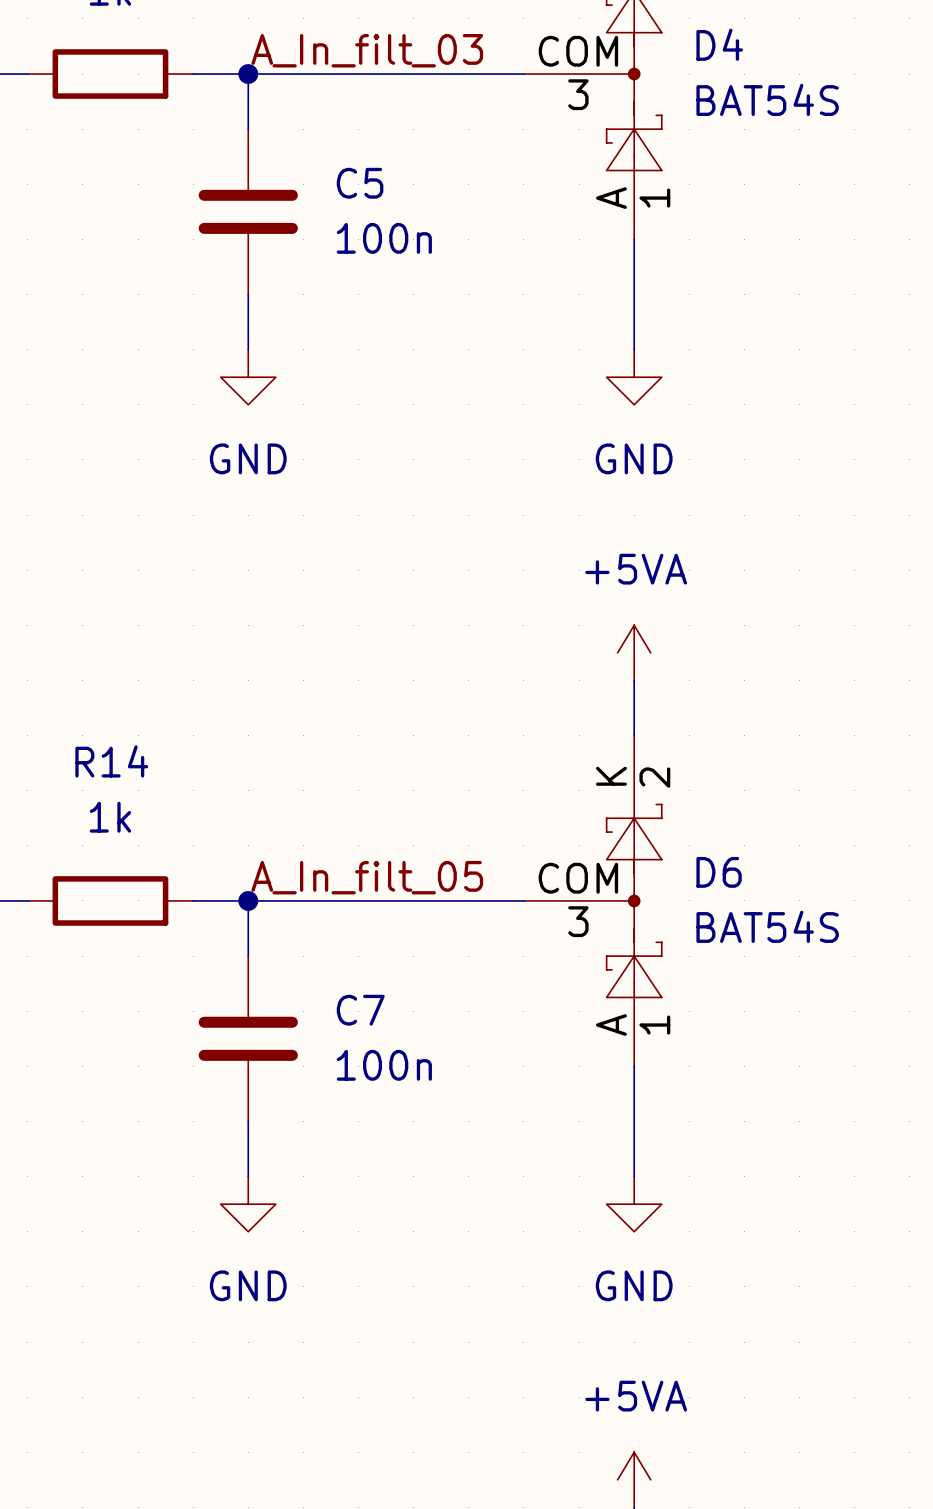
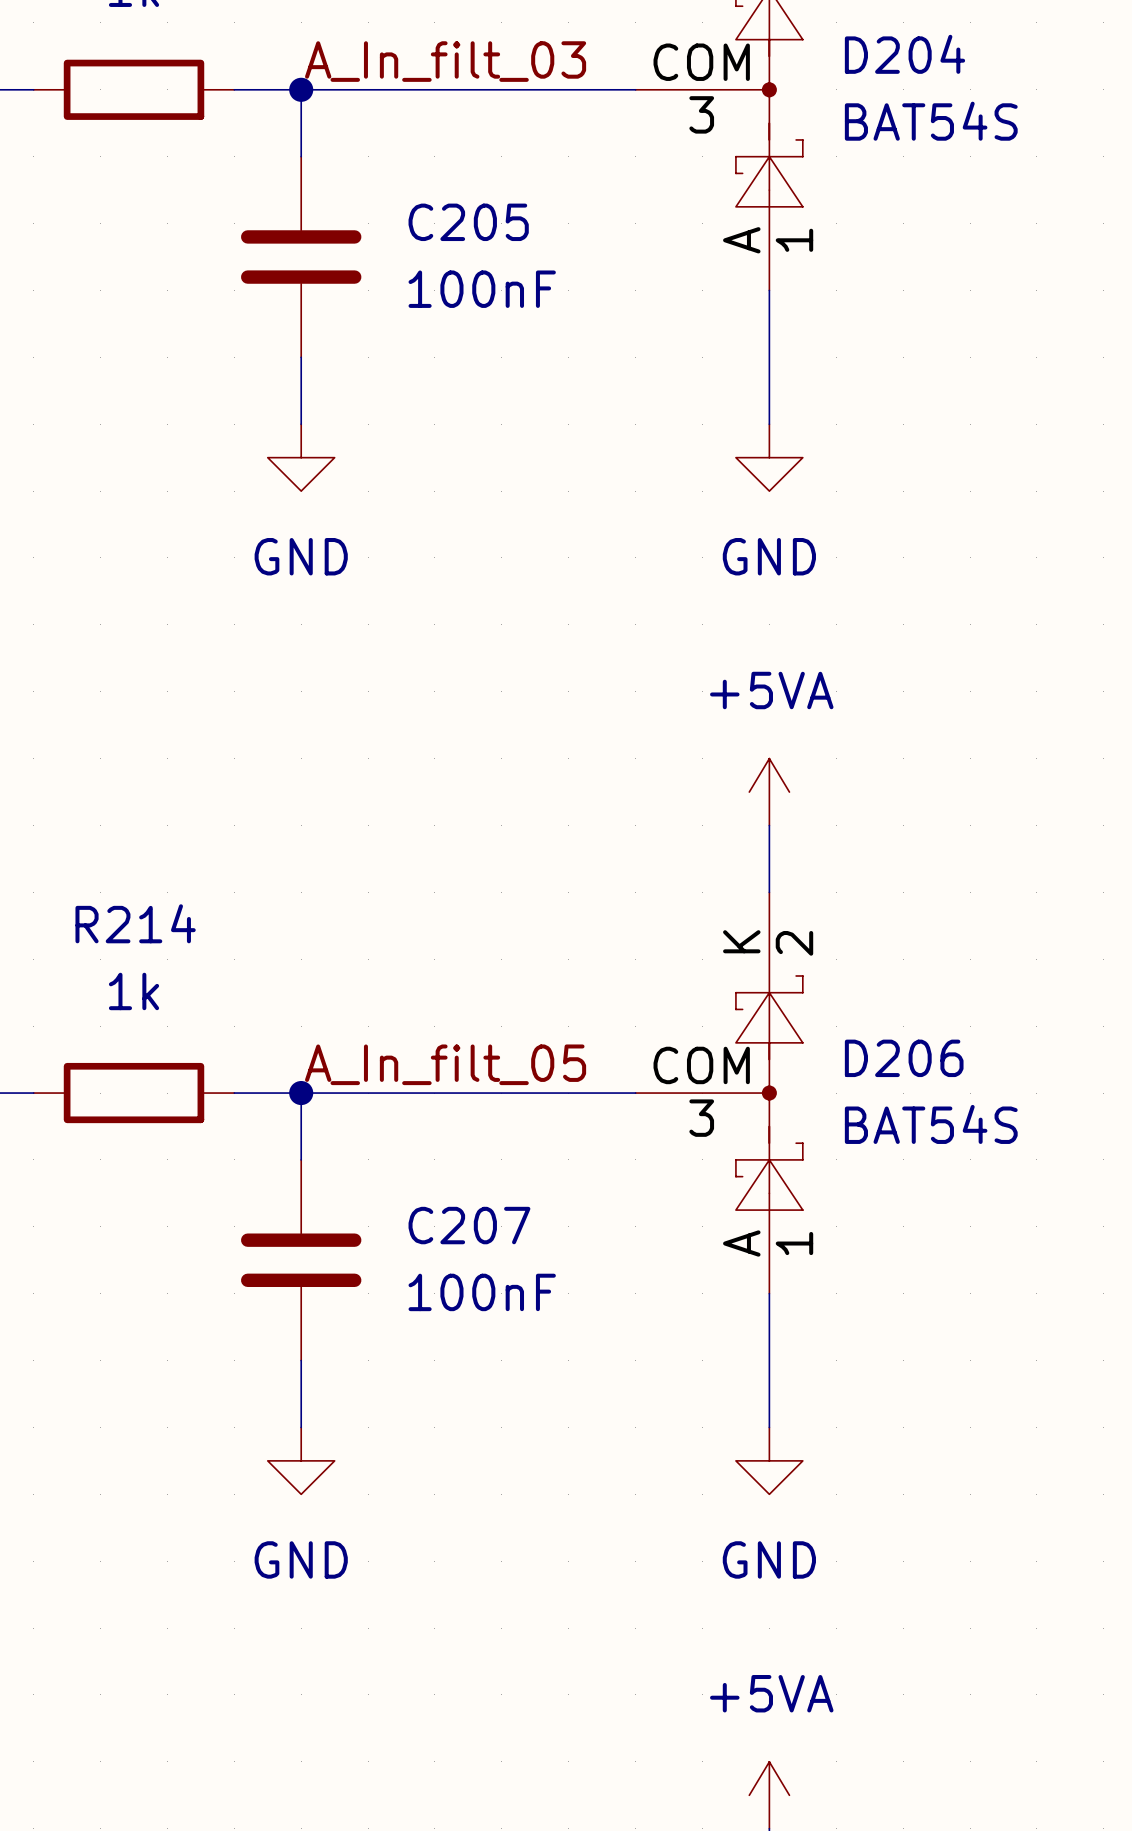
D4 name: D4 (719, 44) -> D204 (904, 54)
C5 name: C5 (360, 183) -> C205 (468, 222)
C5 value: 100n (384, 238) -> 100nF (482, 289)
R14 name: R14 (111, 761) -> R214 (135, 923)
D6 name: D6 (719, 872) -> D206 (904, 1058)
C7 name: C7 (360, 1010) -> C207 (469, 1225)
C7 value: 100n (384, 1065) -> 100nF (482, 1292)

